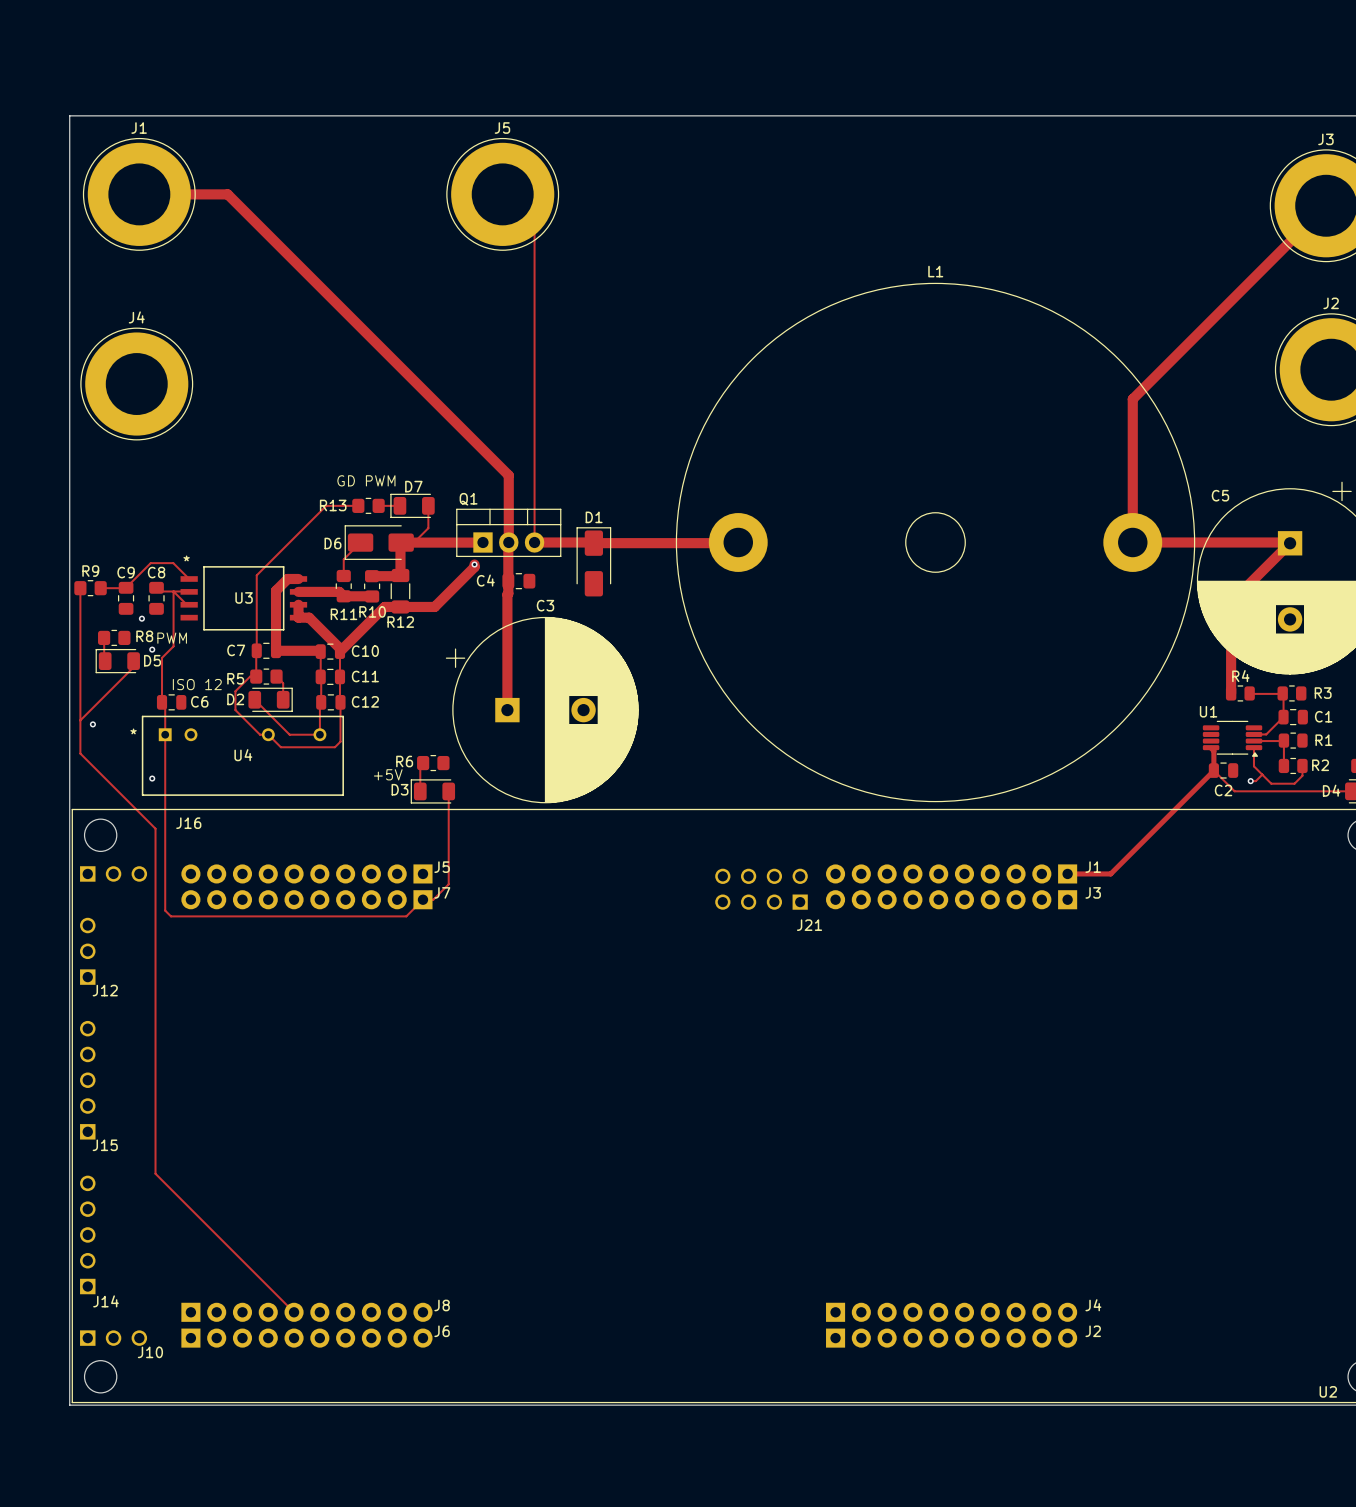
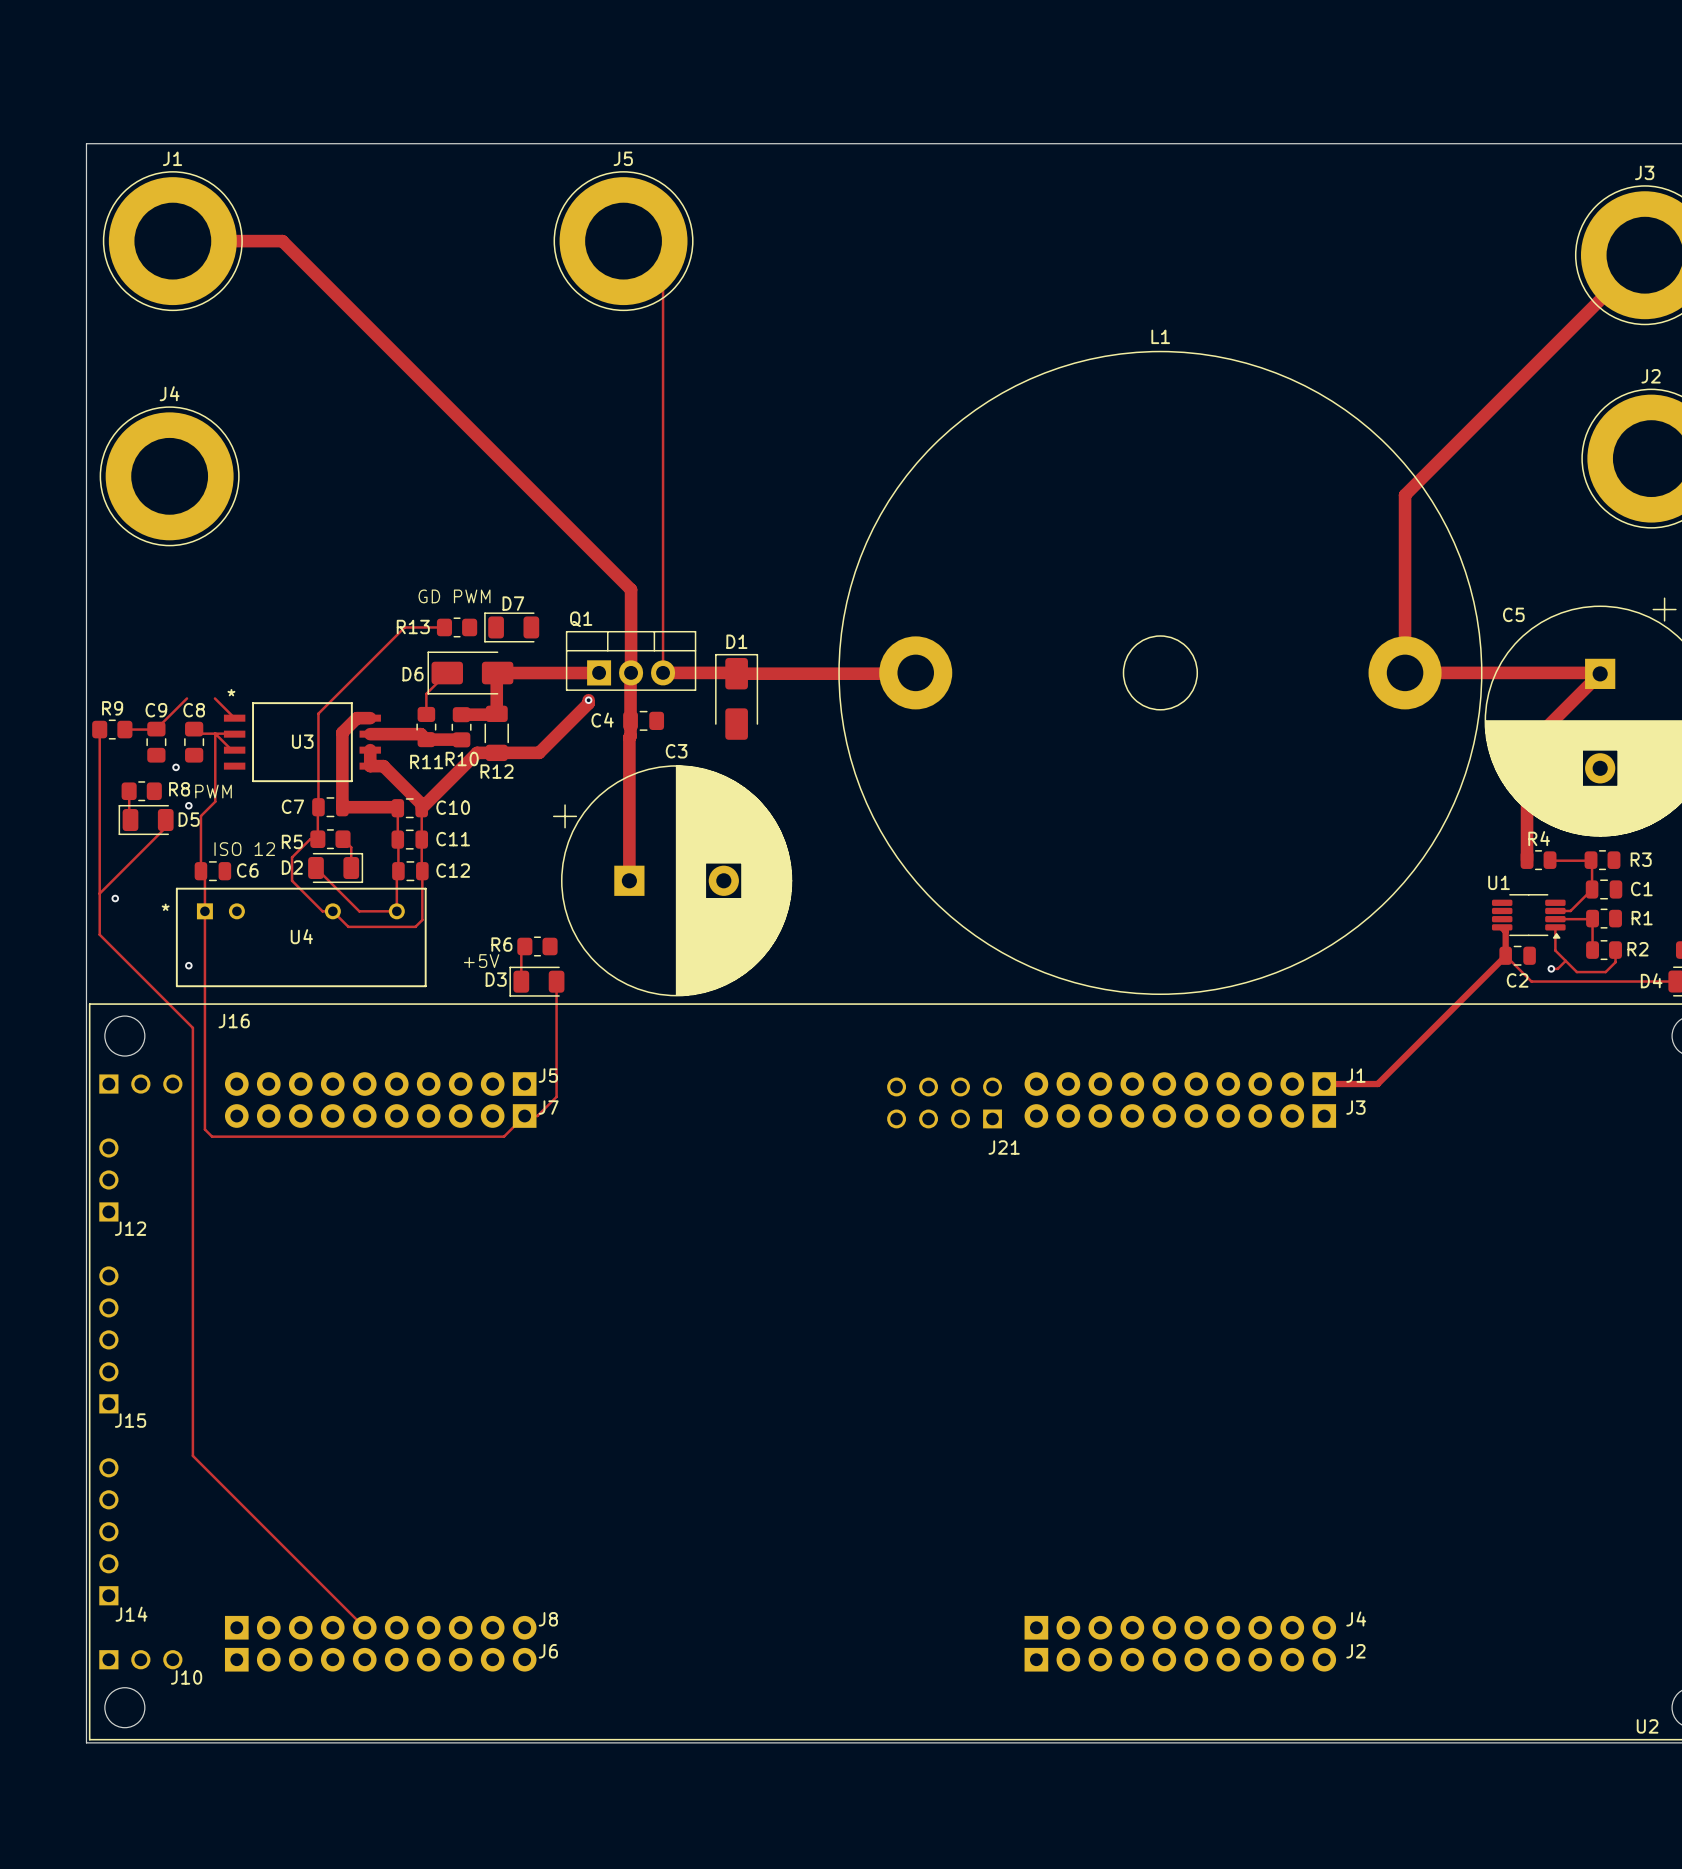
track: (378, 505) (399, 505) -> none
track: (428, 505) (428, 528) (413, 542) (401, 542) -> none
track: (150, 563) (173, 563) -> none

